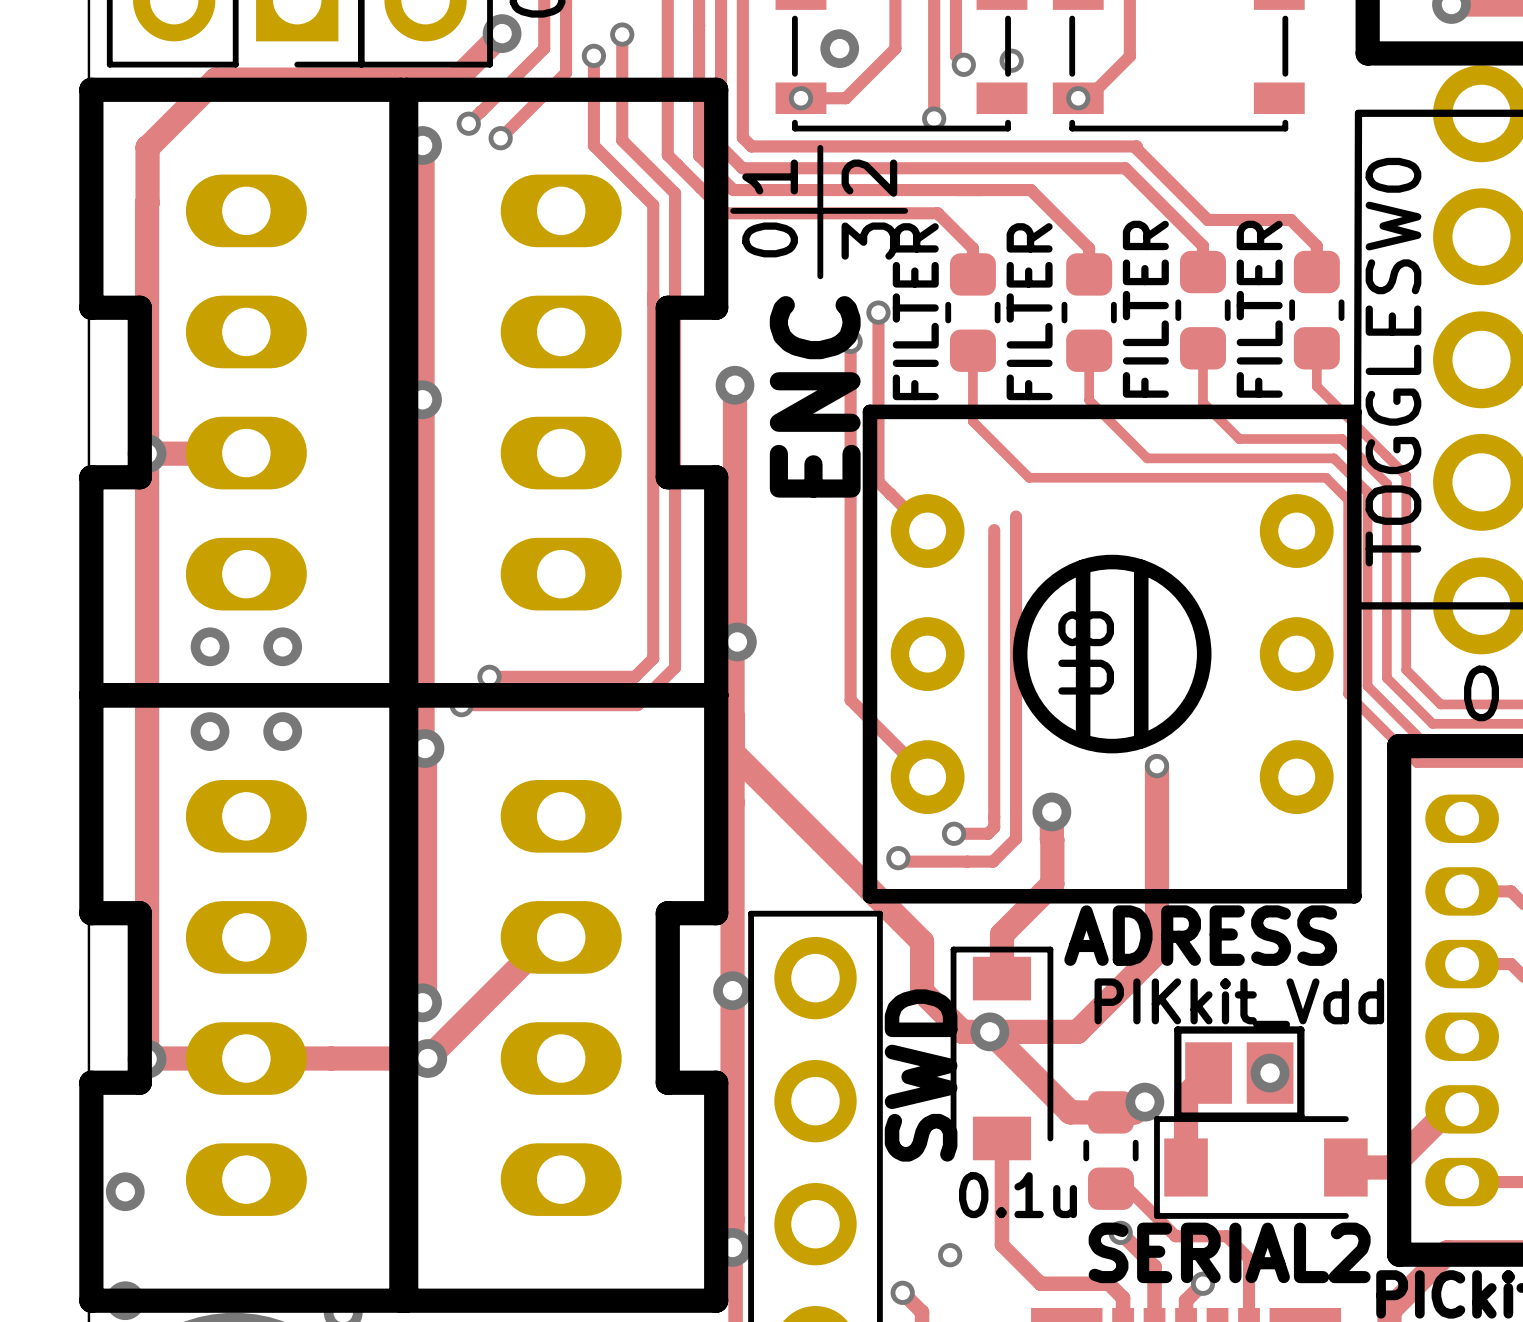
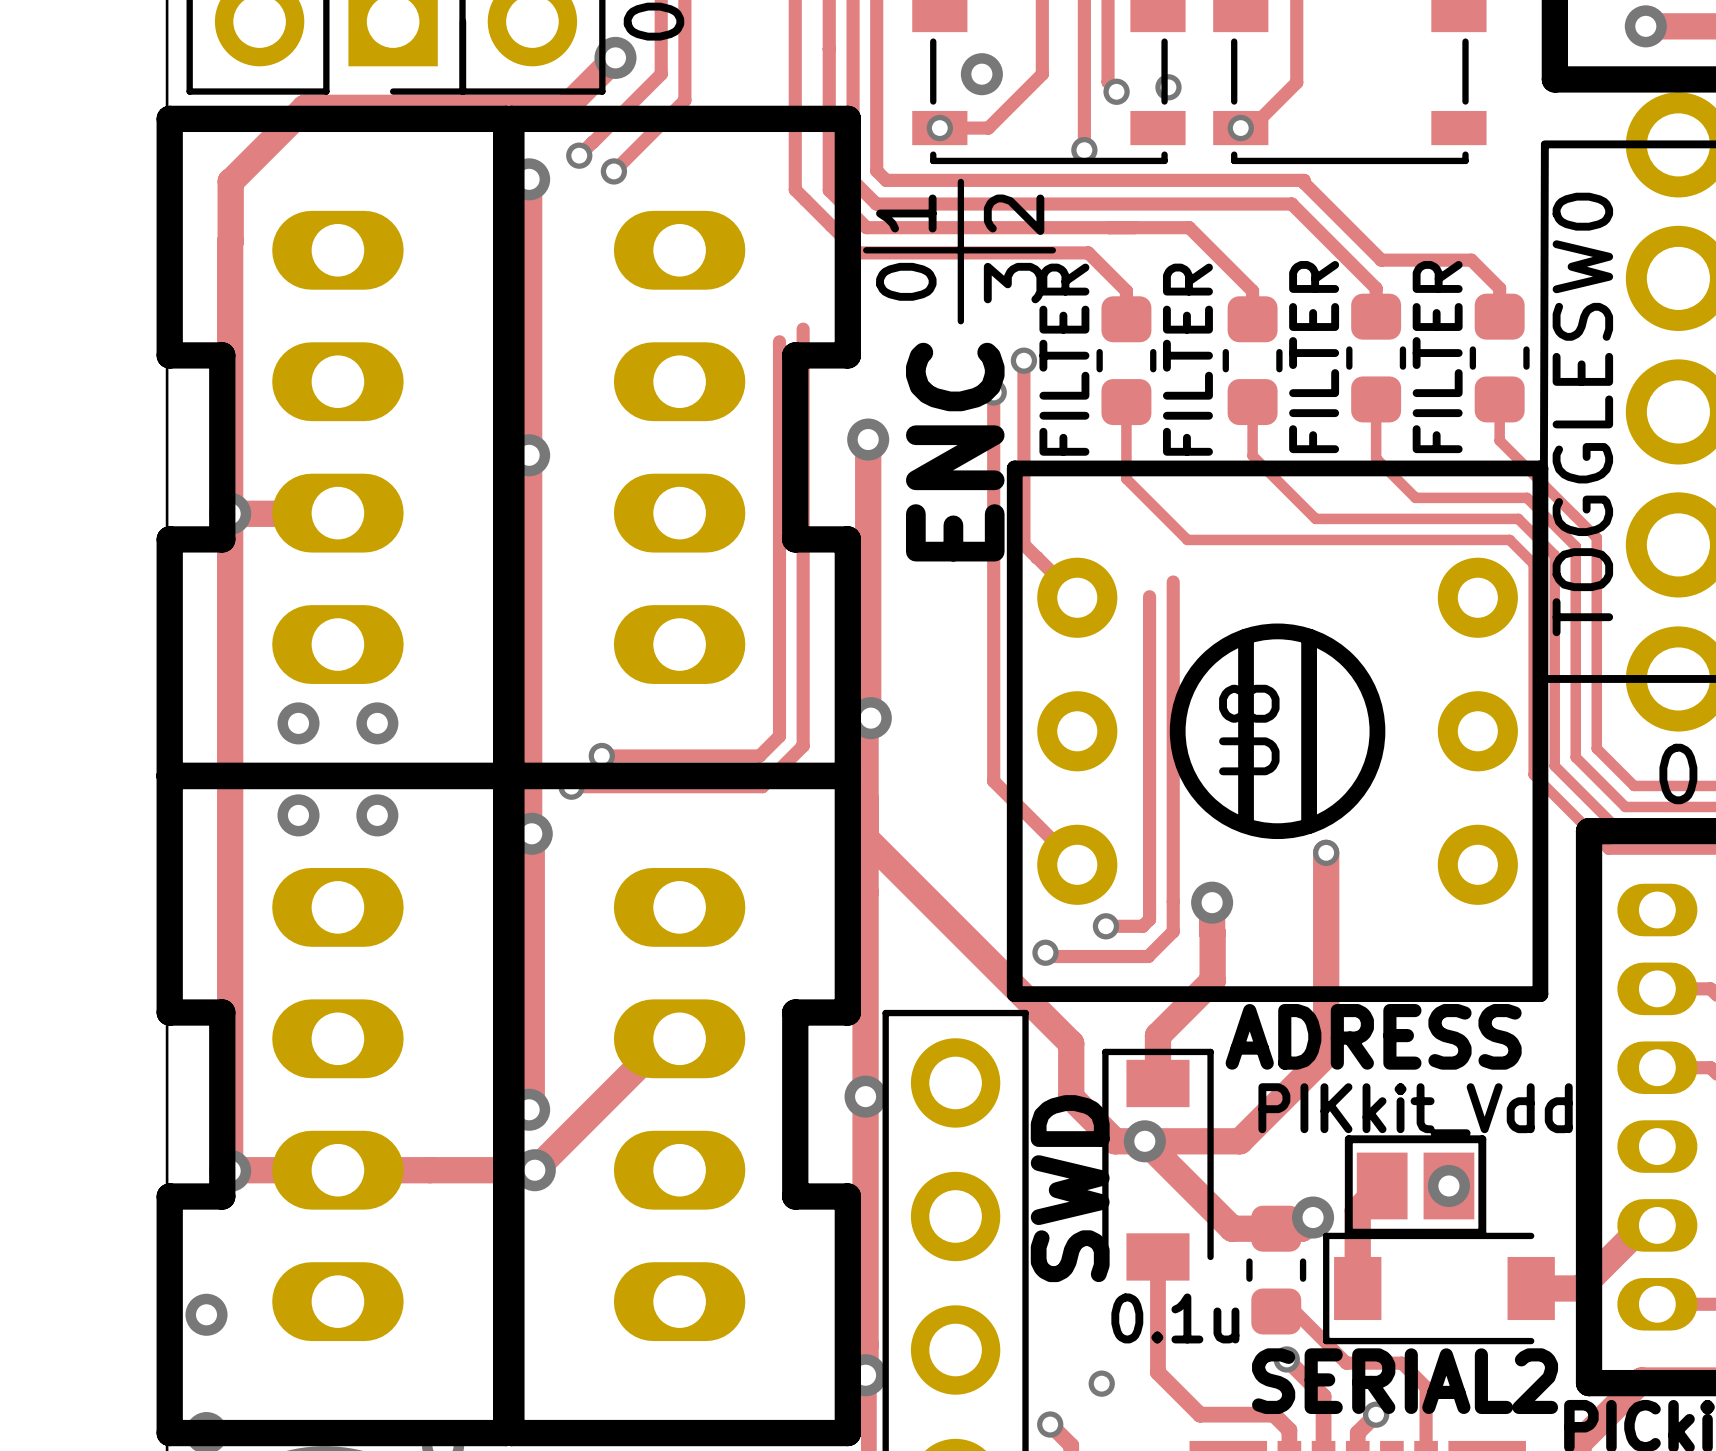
track: (622, 34) (622, 140) (675, 193) (675, 283) -> none
via: (622, 34) -> none
track: (593, 55) (593, 145) (653, 205) (653, 295) -> none
via: (593, 55) -> none

